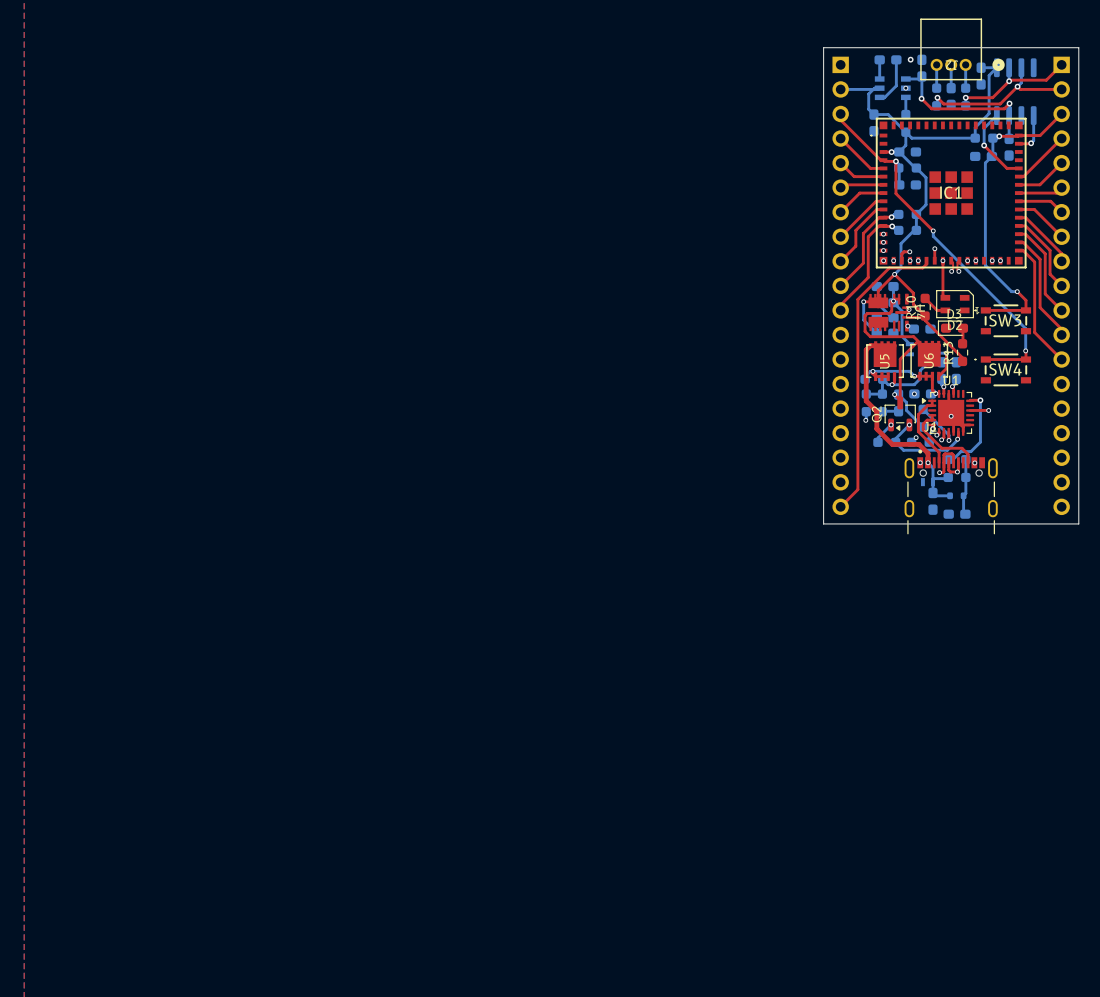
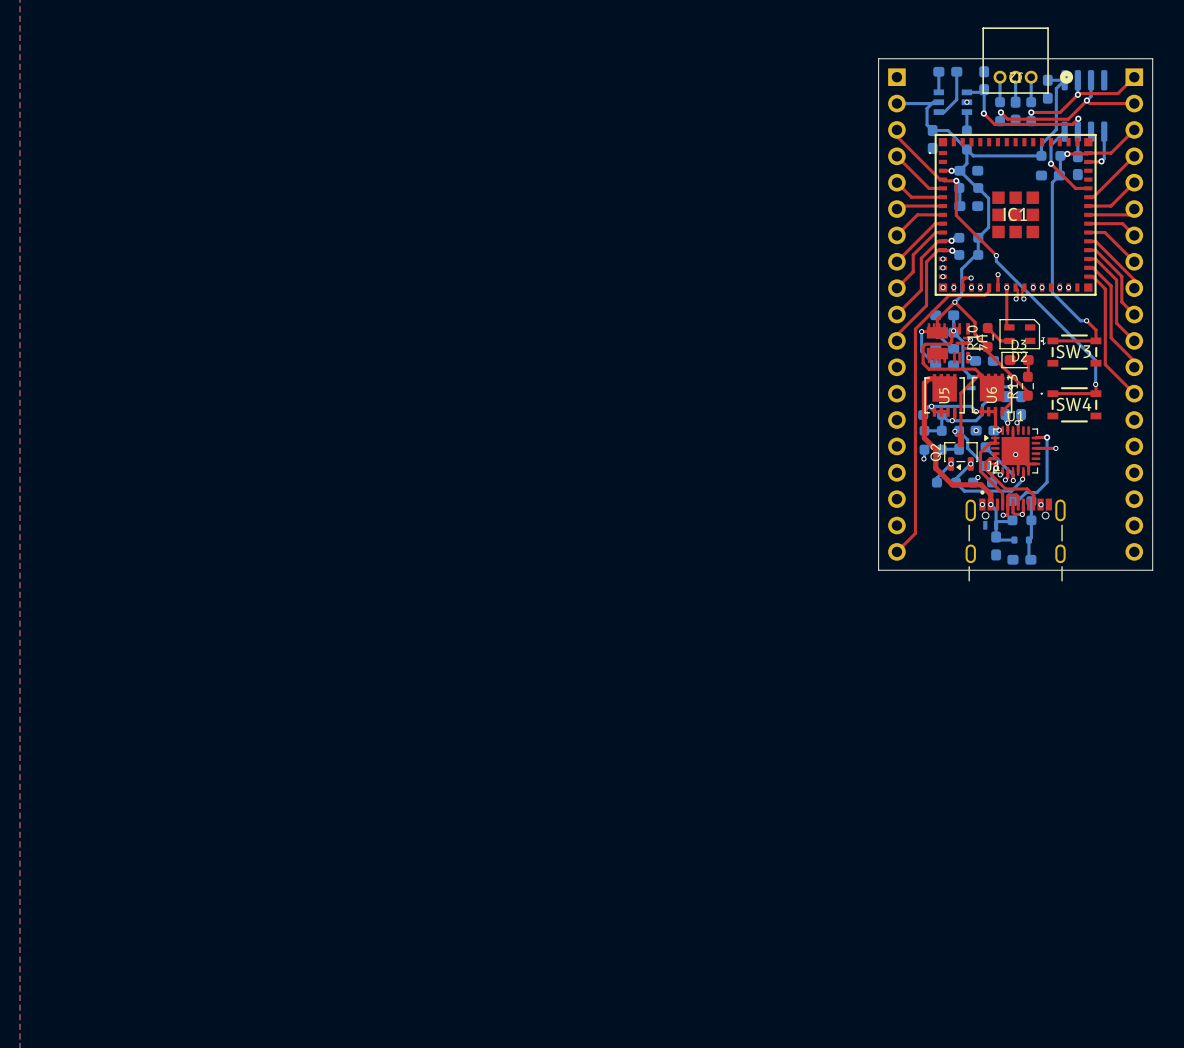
via: (910, 59) -> none

